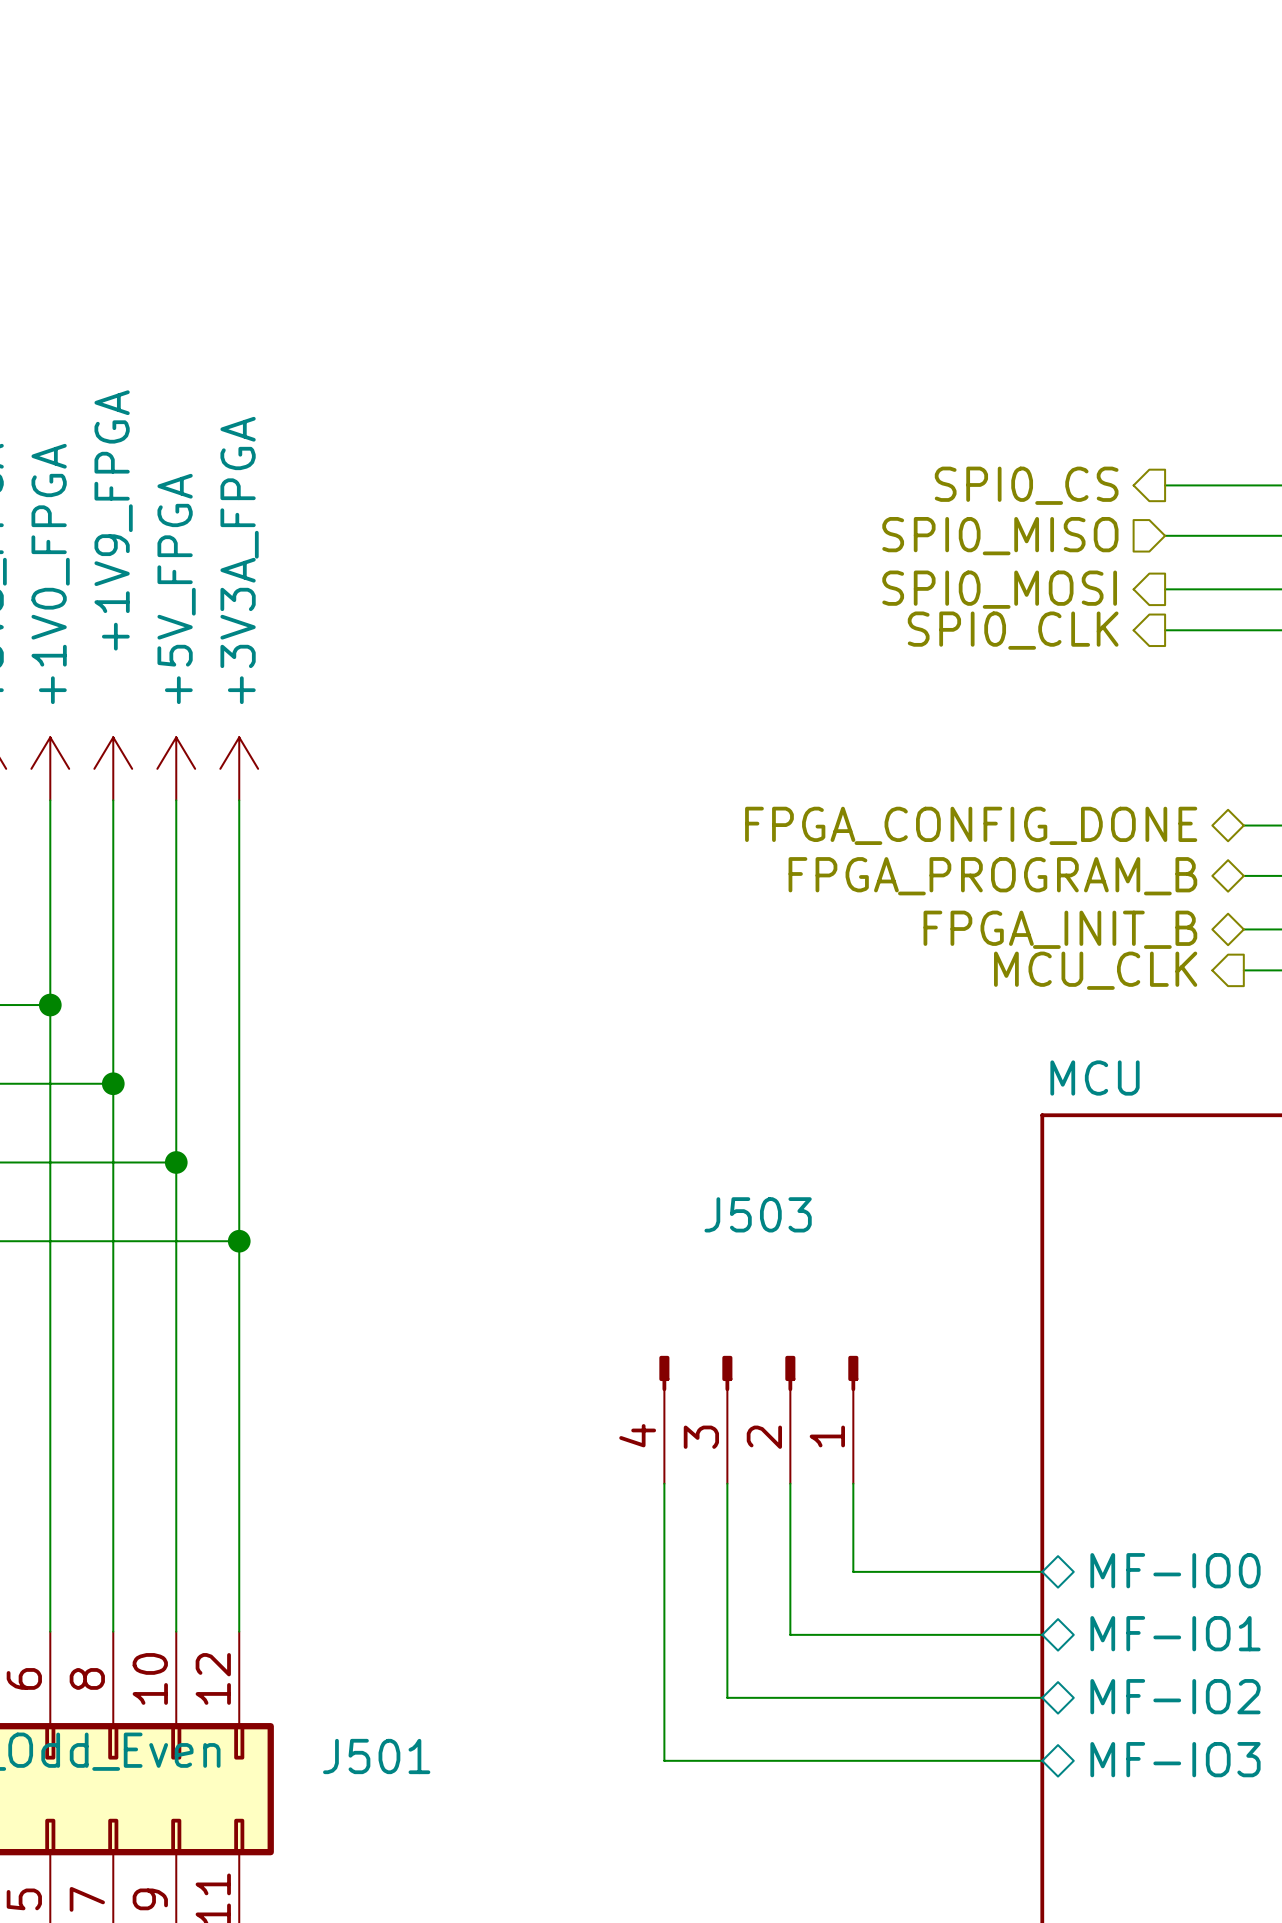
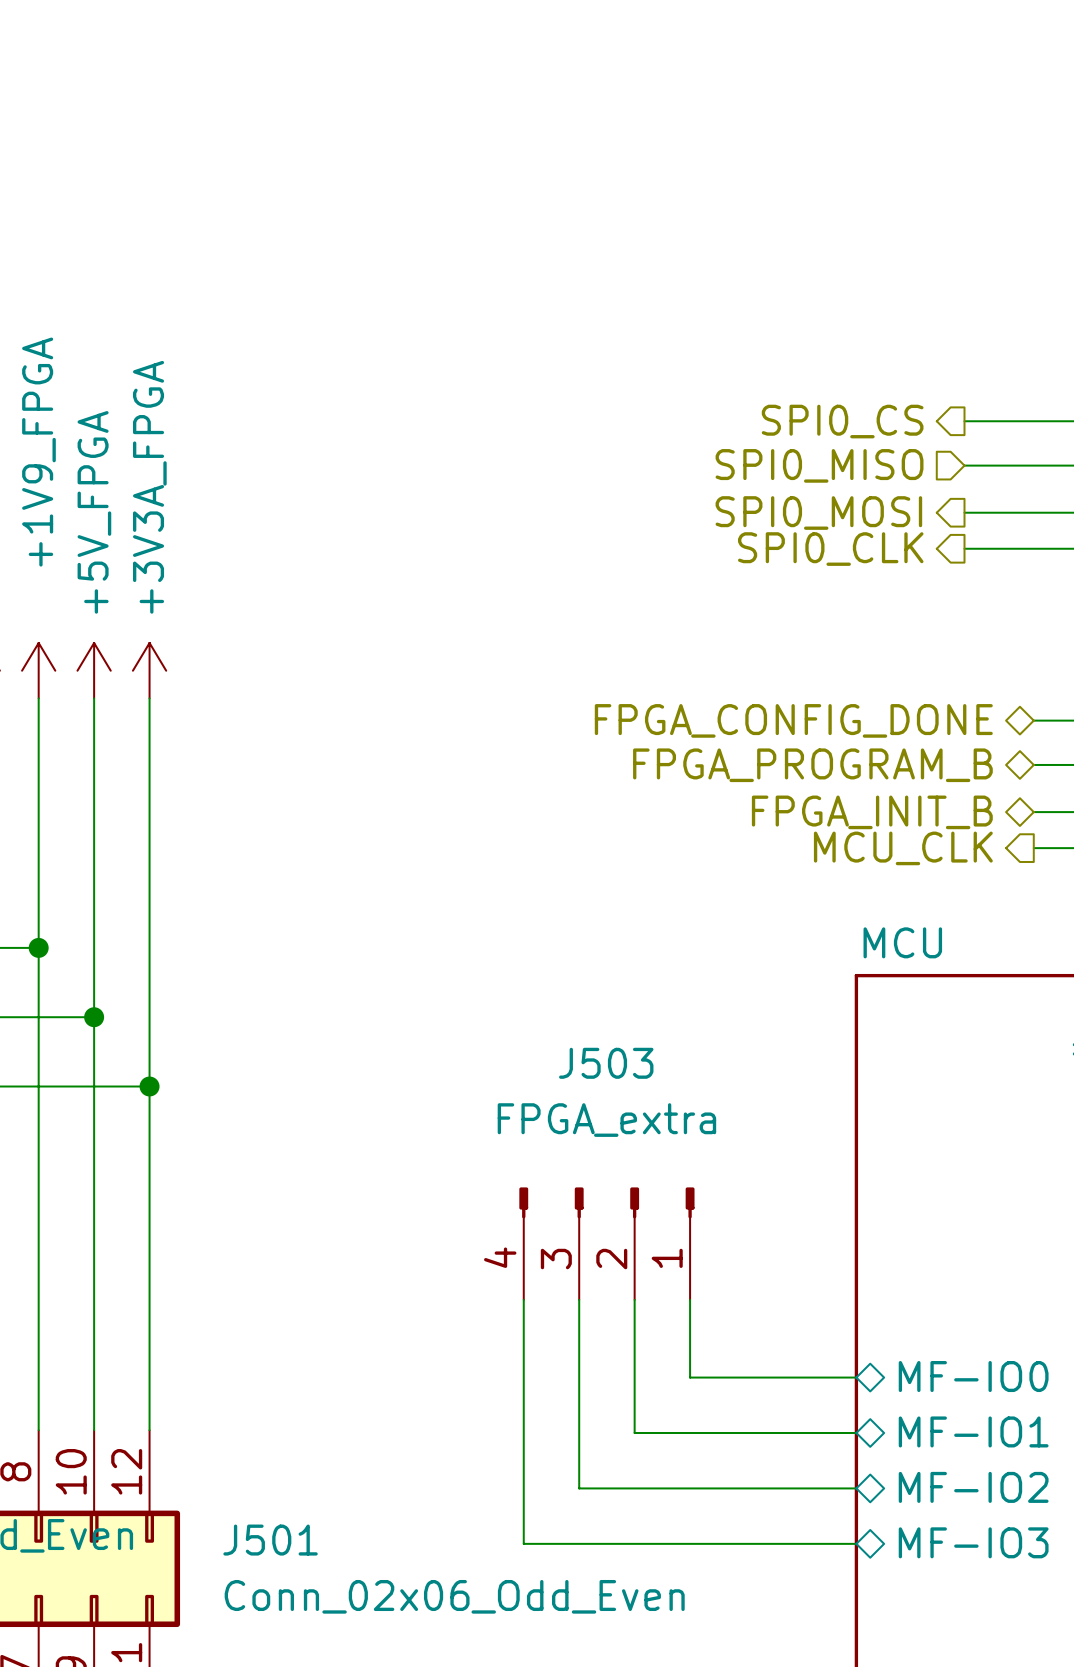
J503 value: none -> FPGA_extra (606, 1120)
J501 value: none -> Conn_02x06_Odd_Even (454, 1596)

